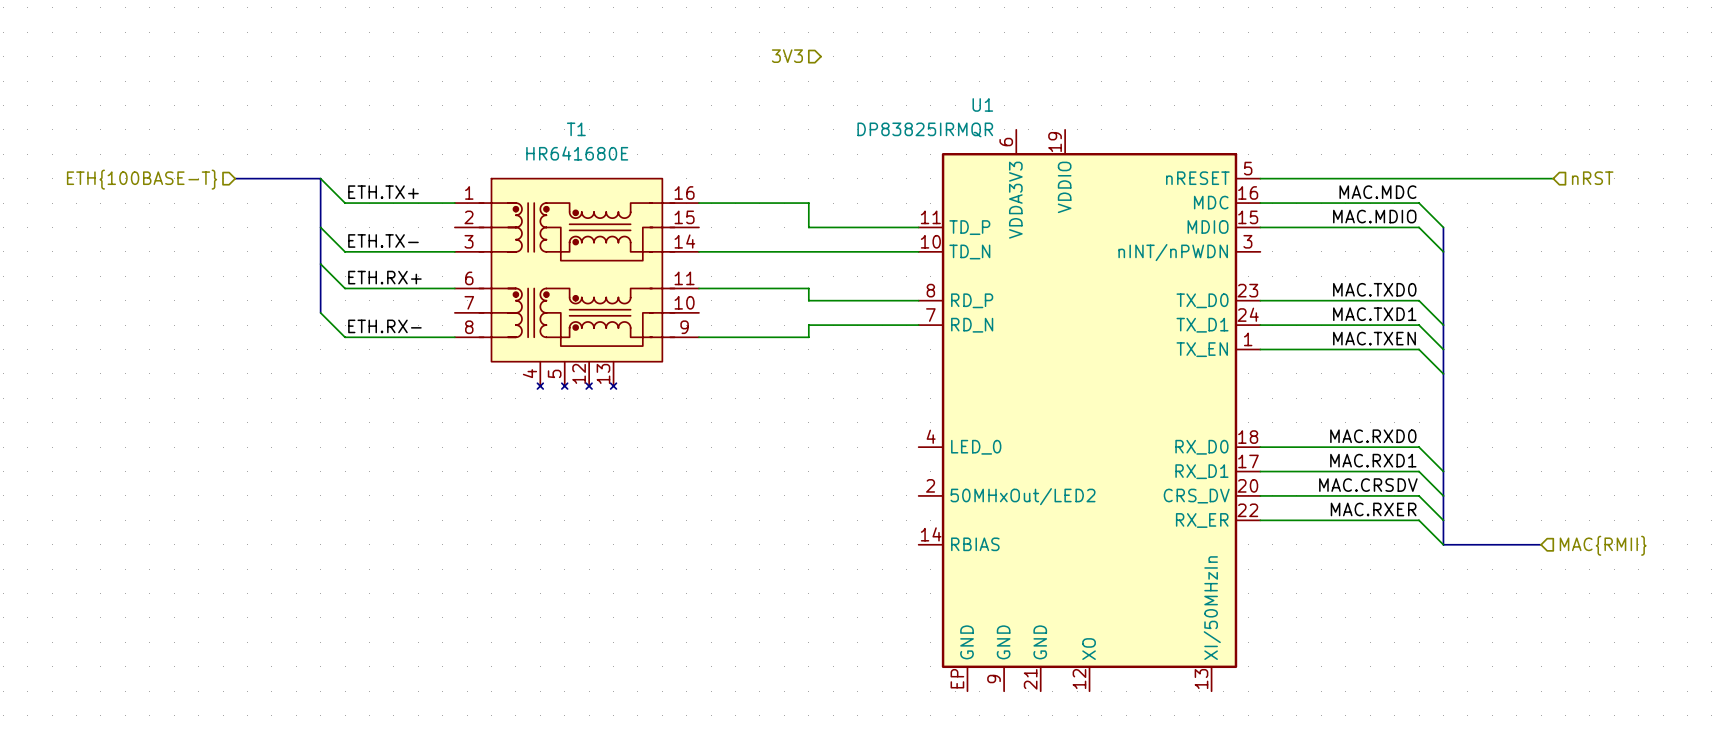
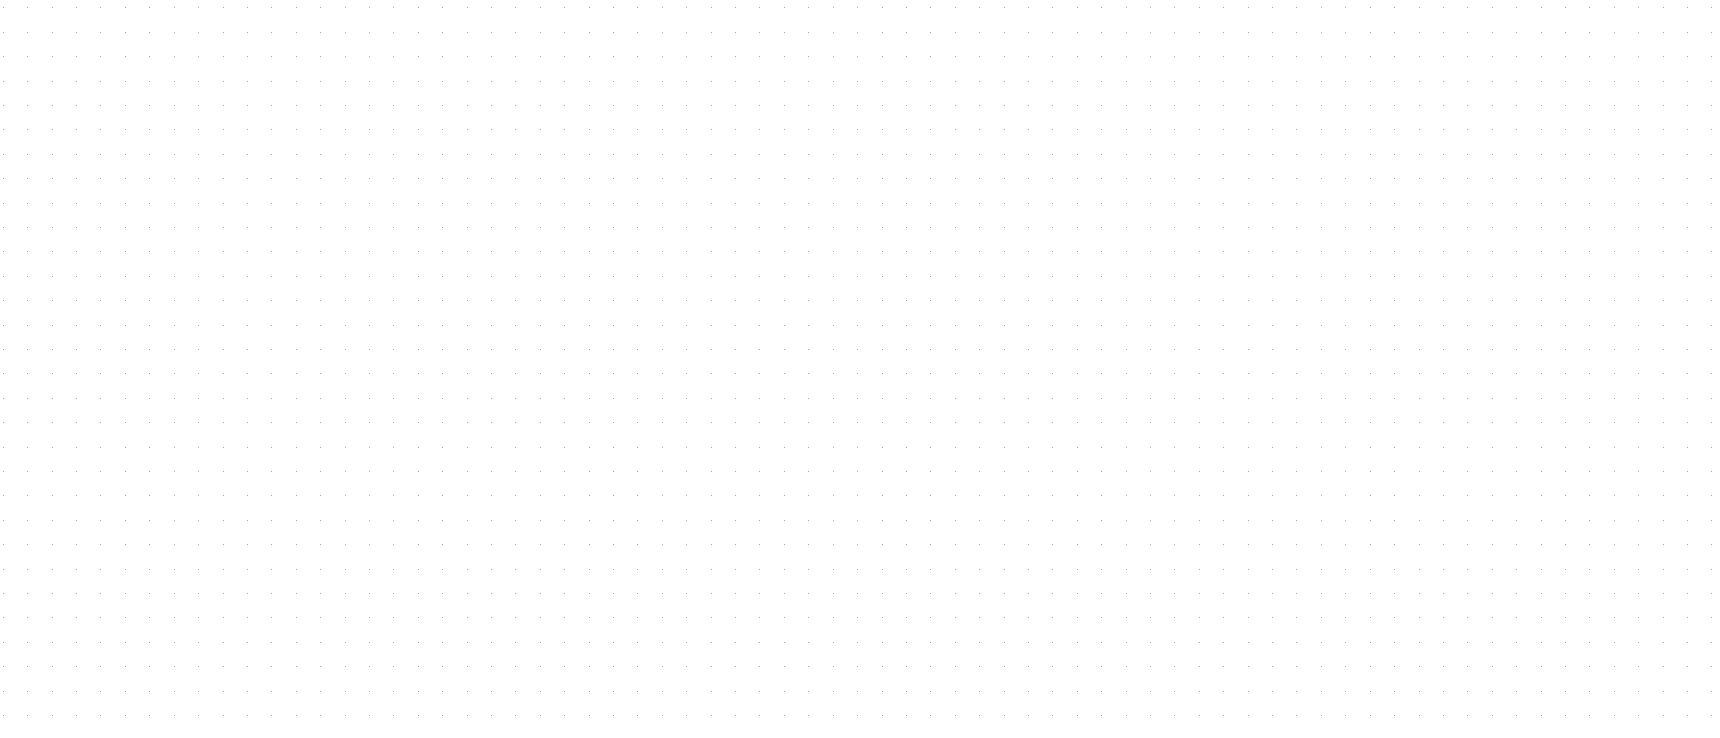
hierarchical label: 3V3 (787, 56) -> none
bus: (235, 178) (320, 178) (320, 312) -> none
wire: (320, 178) (345, 203) (454, 203) -> none
wire: (1260, 178) (1553, 178) -> none
hierarchical label: nRST (1592, 178) -> none
hierarchical label: ETH{100BASE-T} (142, 179) -> none
label: ETH.TX+ (383, 192) -> none
label: MAC.MDC (1377, 192) -> none
wire: (698, 203) (808, 203) (808, 227) (918, 227) -> none
wire: (1260, 203) (1419, 203) (1443, 227) -> none
label: MAC.MDIO (1374, 216) -> none
wire: (320, 227) (345, 251) (454, 251) -> none
wire: (1260, 227) (1419, 227) (1443, 251) -> none
bus: (1443, 227) (1443, 544) (1541, 544) -> none
label: ETH.TX- (383, 240) -> none
wire: (698, 251) (918, 251) -> none
wire: (320, 264) (345, 288) (454, 288) -> none
label: ETH.RX+ (384, 277) -> none
T1: HR641680E (576, 283) -> none
wire: (698, 288) (808, 288) (808, 300) (918, 300) -> none
label: MAC.TXD0 (1374, 289) -> none
wire: (1260, 300) (1419, 300) (1443, 325) -> none
wire: (320, 312) (345, 337) (454, 337) -> none
label: MAC.TXD1 (1374, 314) -> none
wire: (918, 325) (808, 325) (808, 337) (698, 337) -> none
wire: (1260, 325) (1419, 325) (1443, 349) -> none
label: ETH.RX- (384, 326) -> none
label: MAC.TXEN (1374, 338) -> none
wire: (1260, 349) (1419, 349) (1443, 373) -> none
U1: DP83825IRMQR (1089, 410) -> none
label: MAC.RXD0 (1373, 436) -> none
wire: (1260, 447) (1419, 447) (1443, 471) -> none
label: MAC.RXD1 (1373, 460) -> none
wire: (1260, 471) (1419, 471) (1443, 495) -> none
label: MAC.CRSDV (1368, 485) -> none
wire: (1260, 495) (1419, 495) (1443, 520) -> none
label: MAC.RXER (1373, 509) -> none
wire: (1260, 520) (1419, 520) (1443, 544) -> none
hierarchical label: MAC{RMII} (1603, 545) -> none

